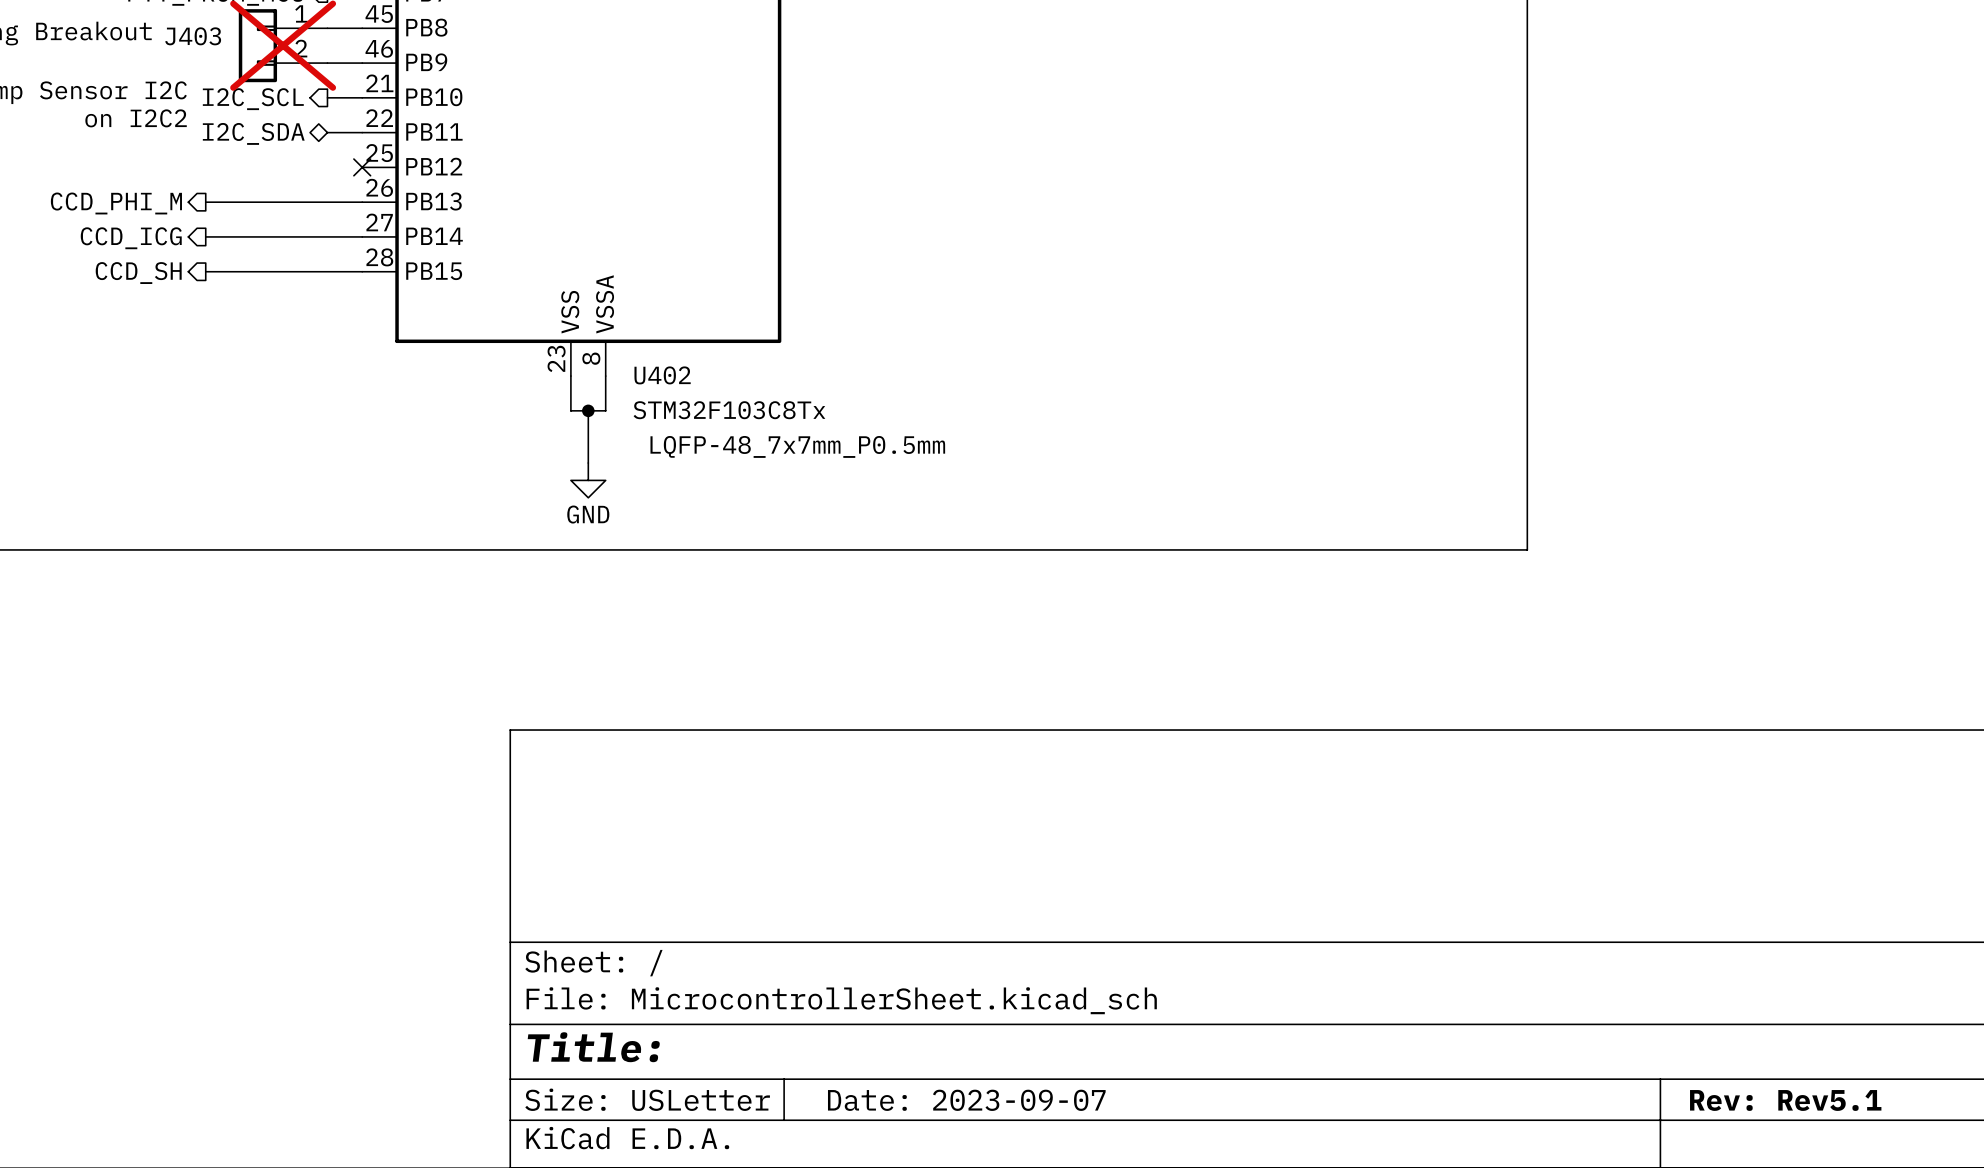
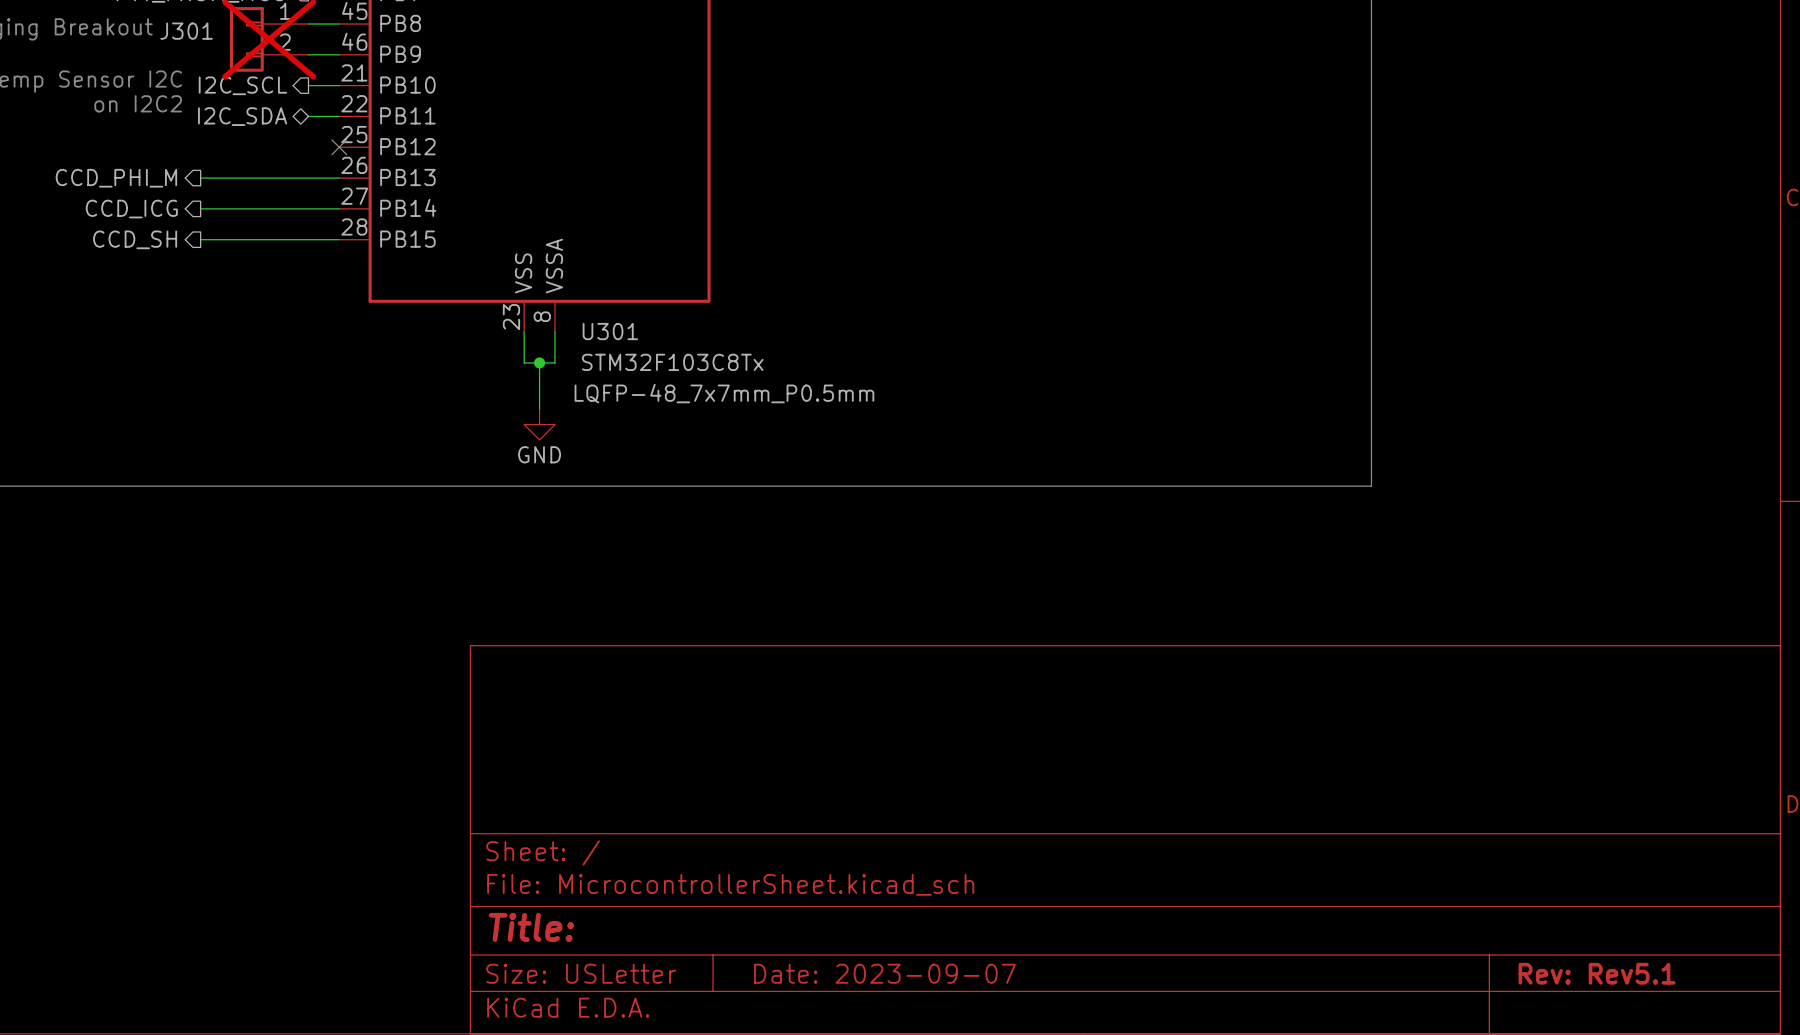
J403 name: J403 (193, 36) -> J301 (186, 31)
U402 name: U402 (662, 375) -> U301 (610, 331)

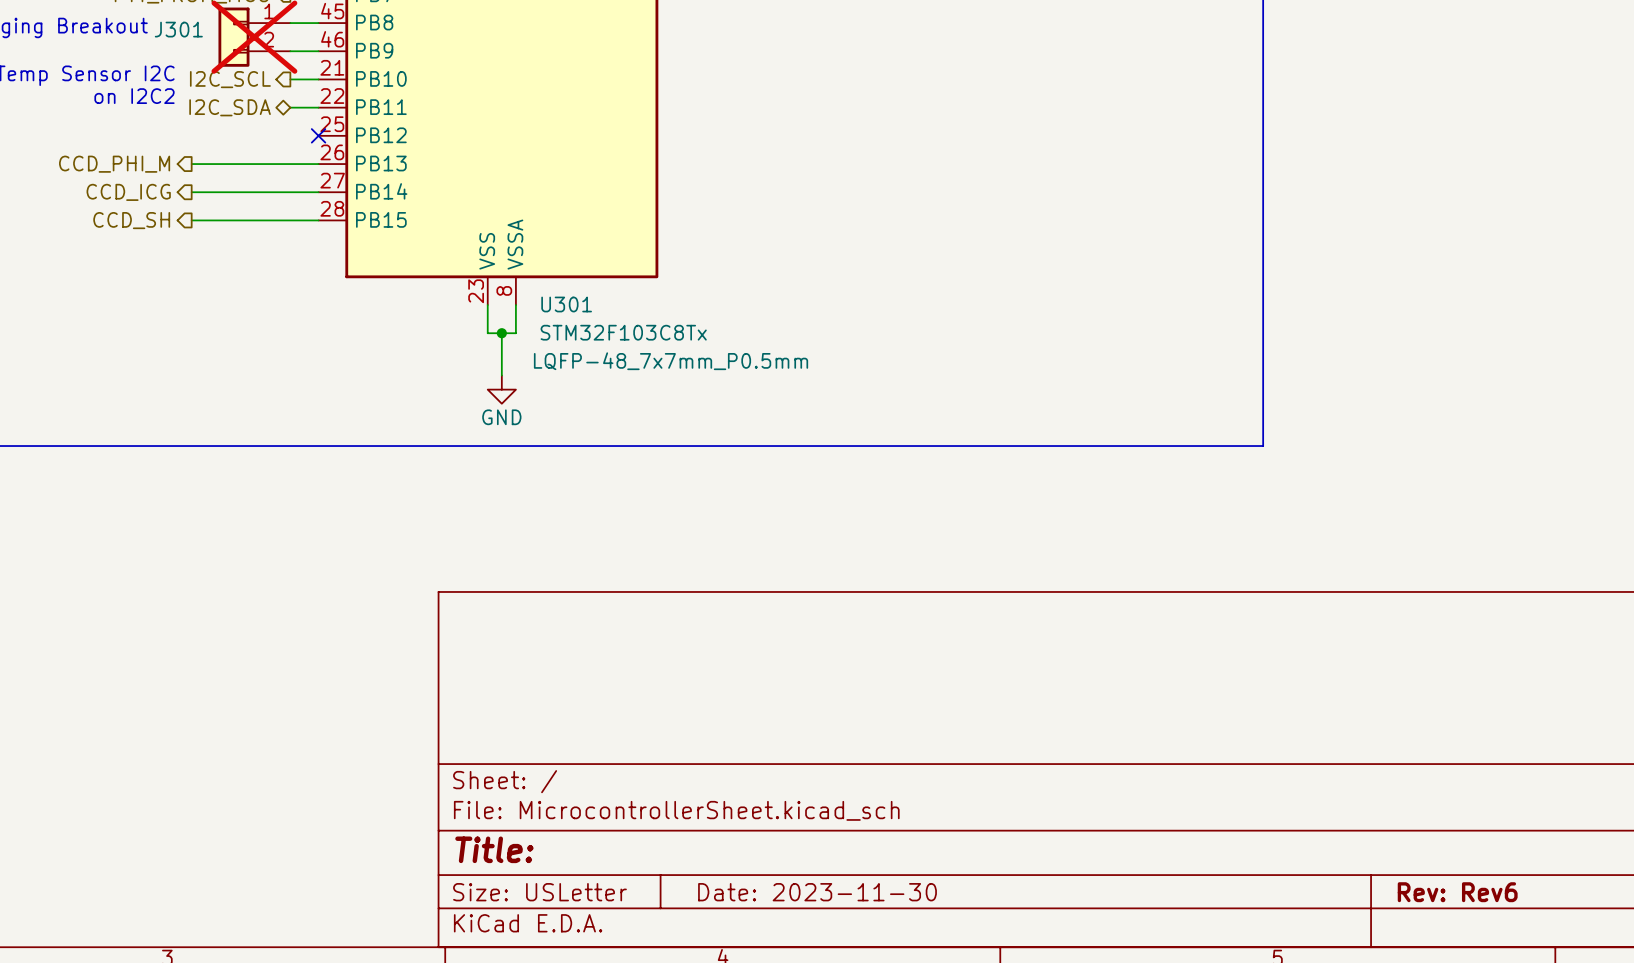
title block: Date: 2023-09-07 (884, 973) -> Date: 2023-11-30 (817, 892)
title block: Rev: Rev5.1 (1597, 973) -> Rev: Rev6 (1457, 892)

